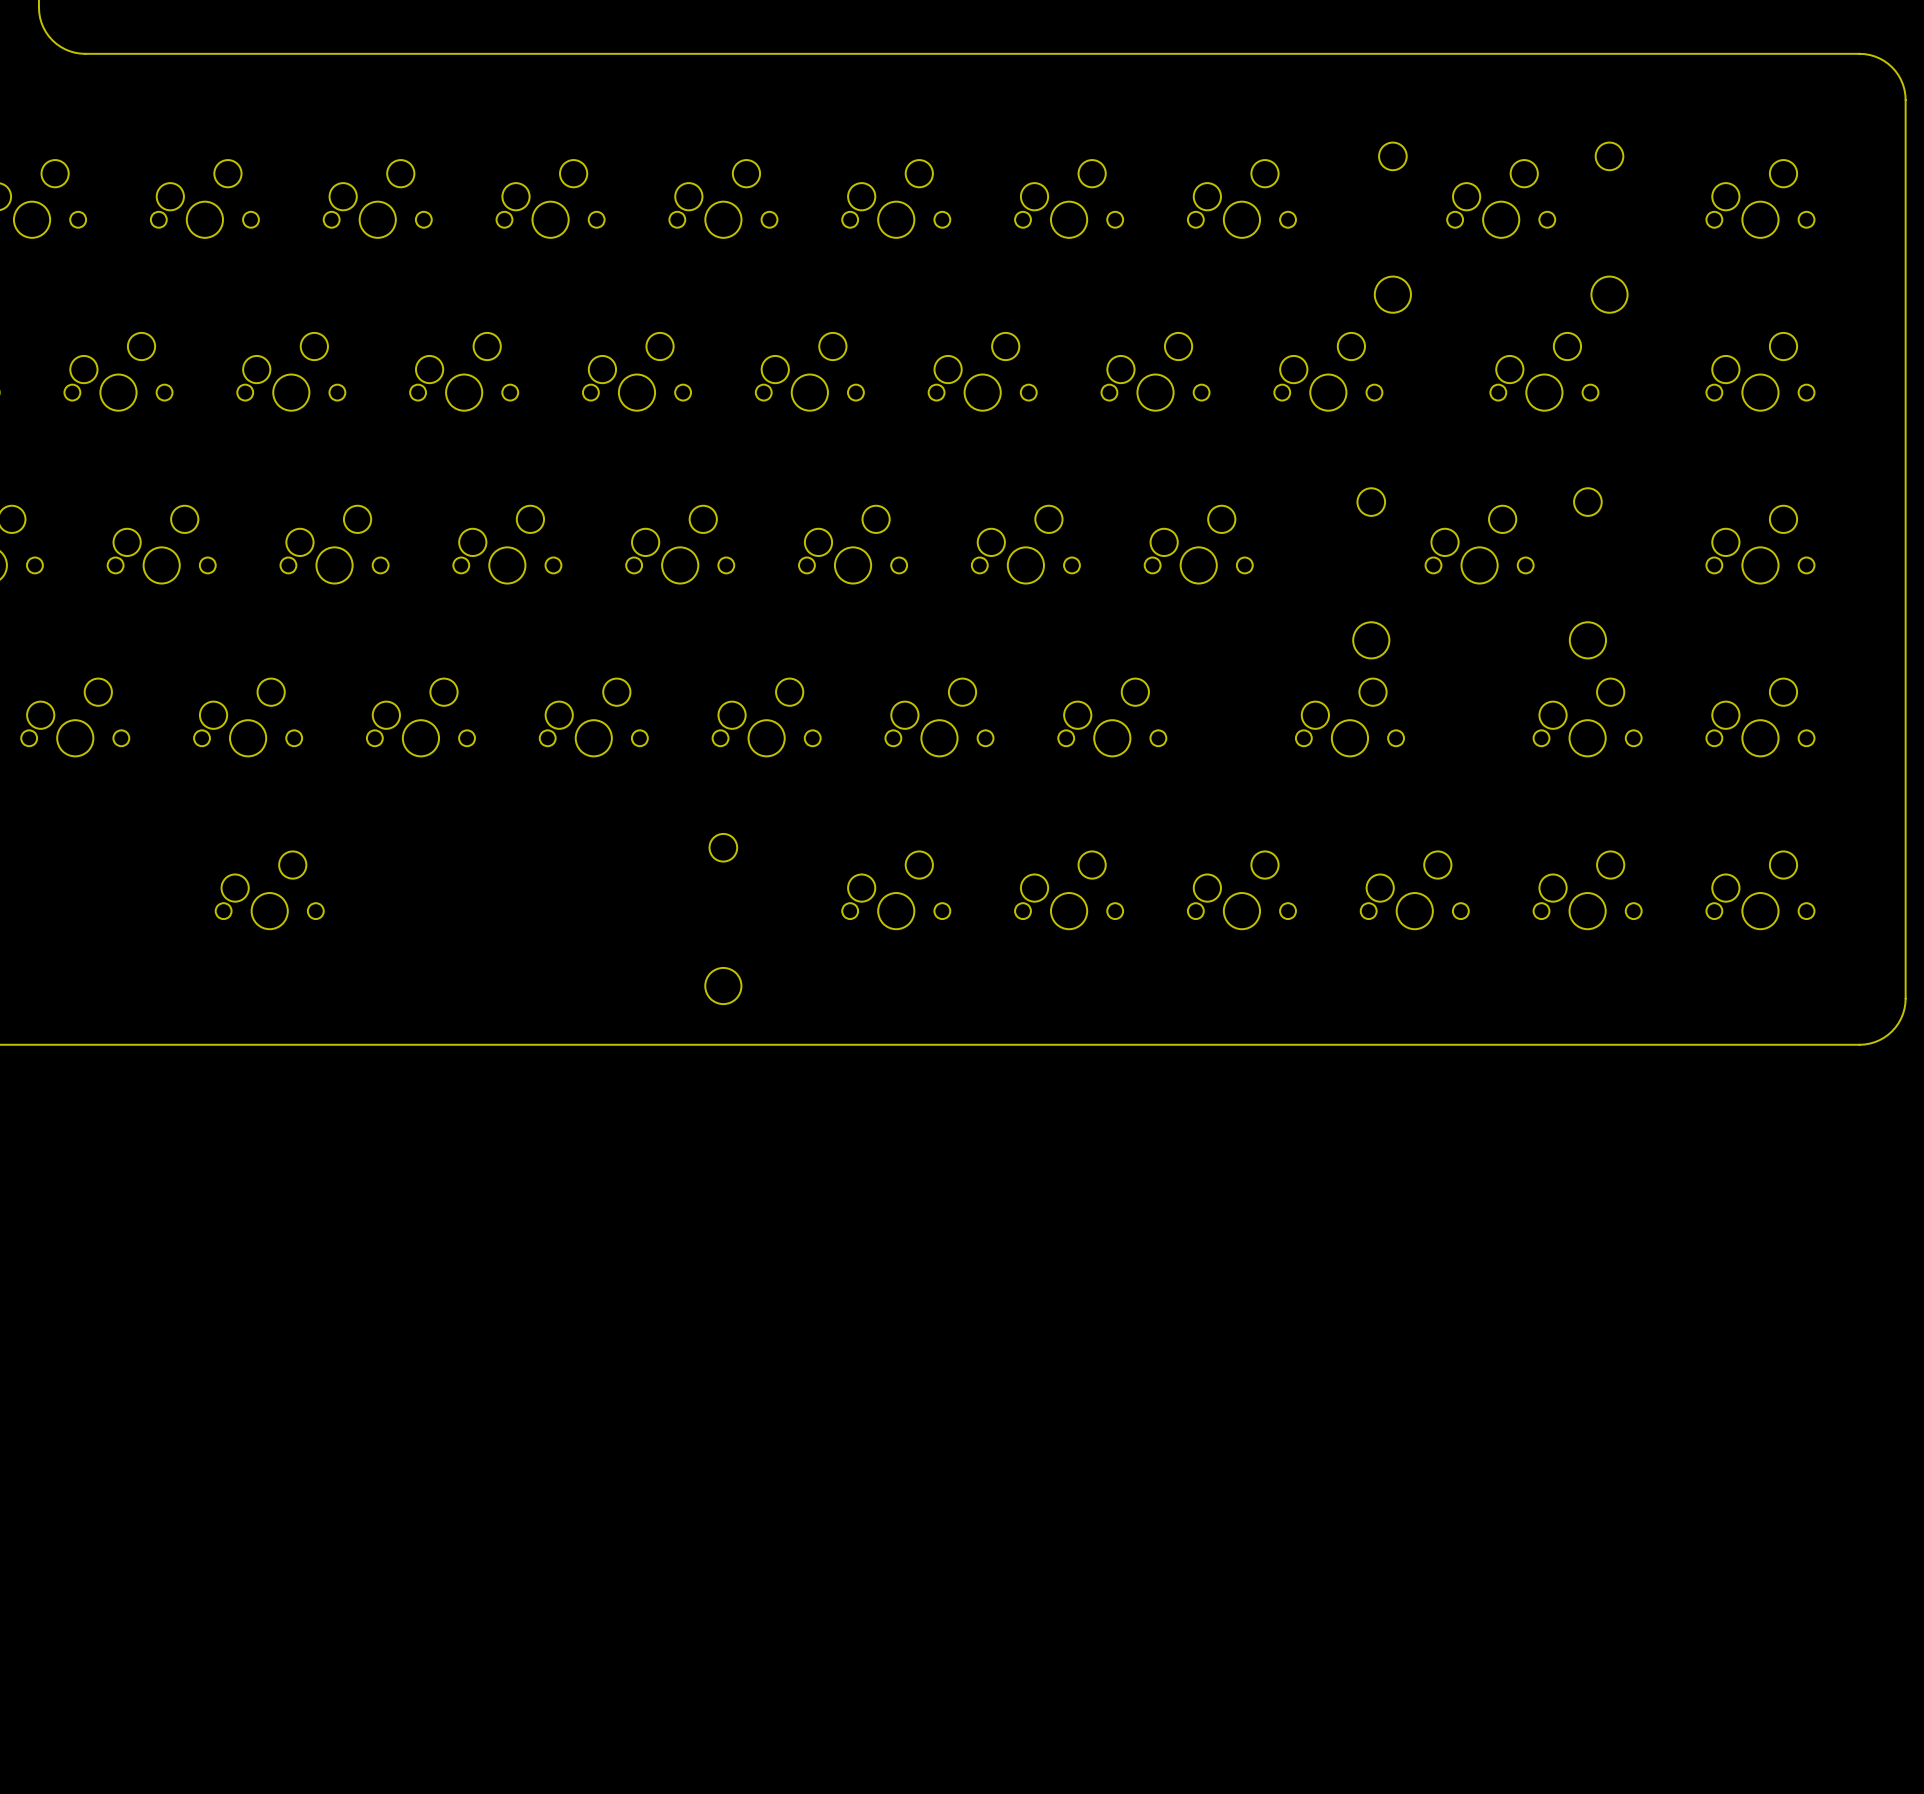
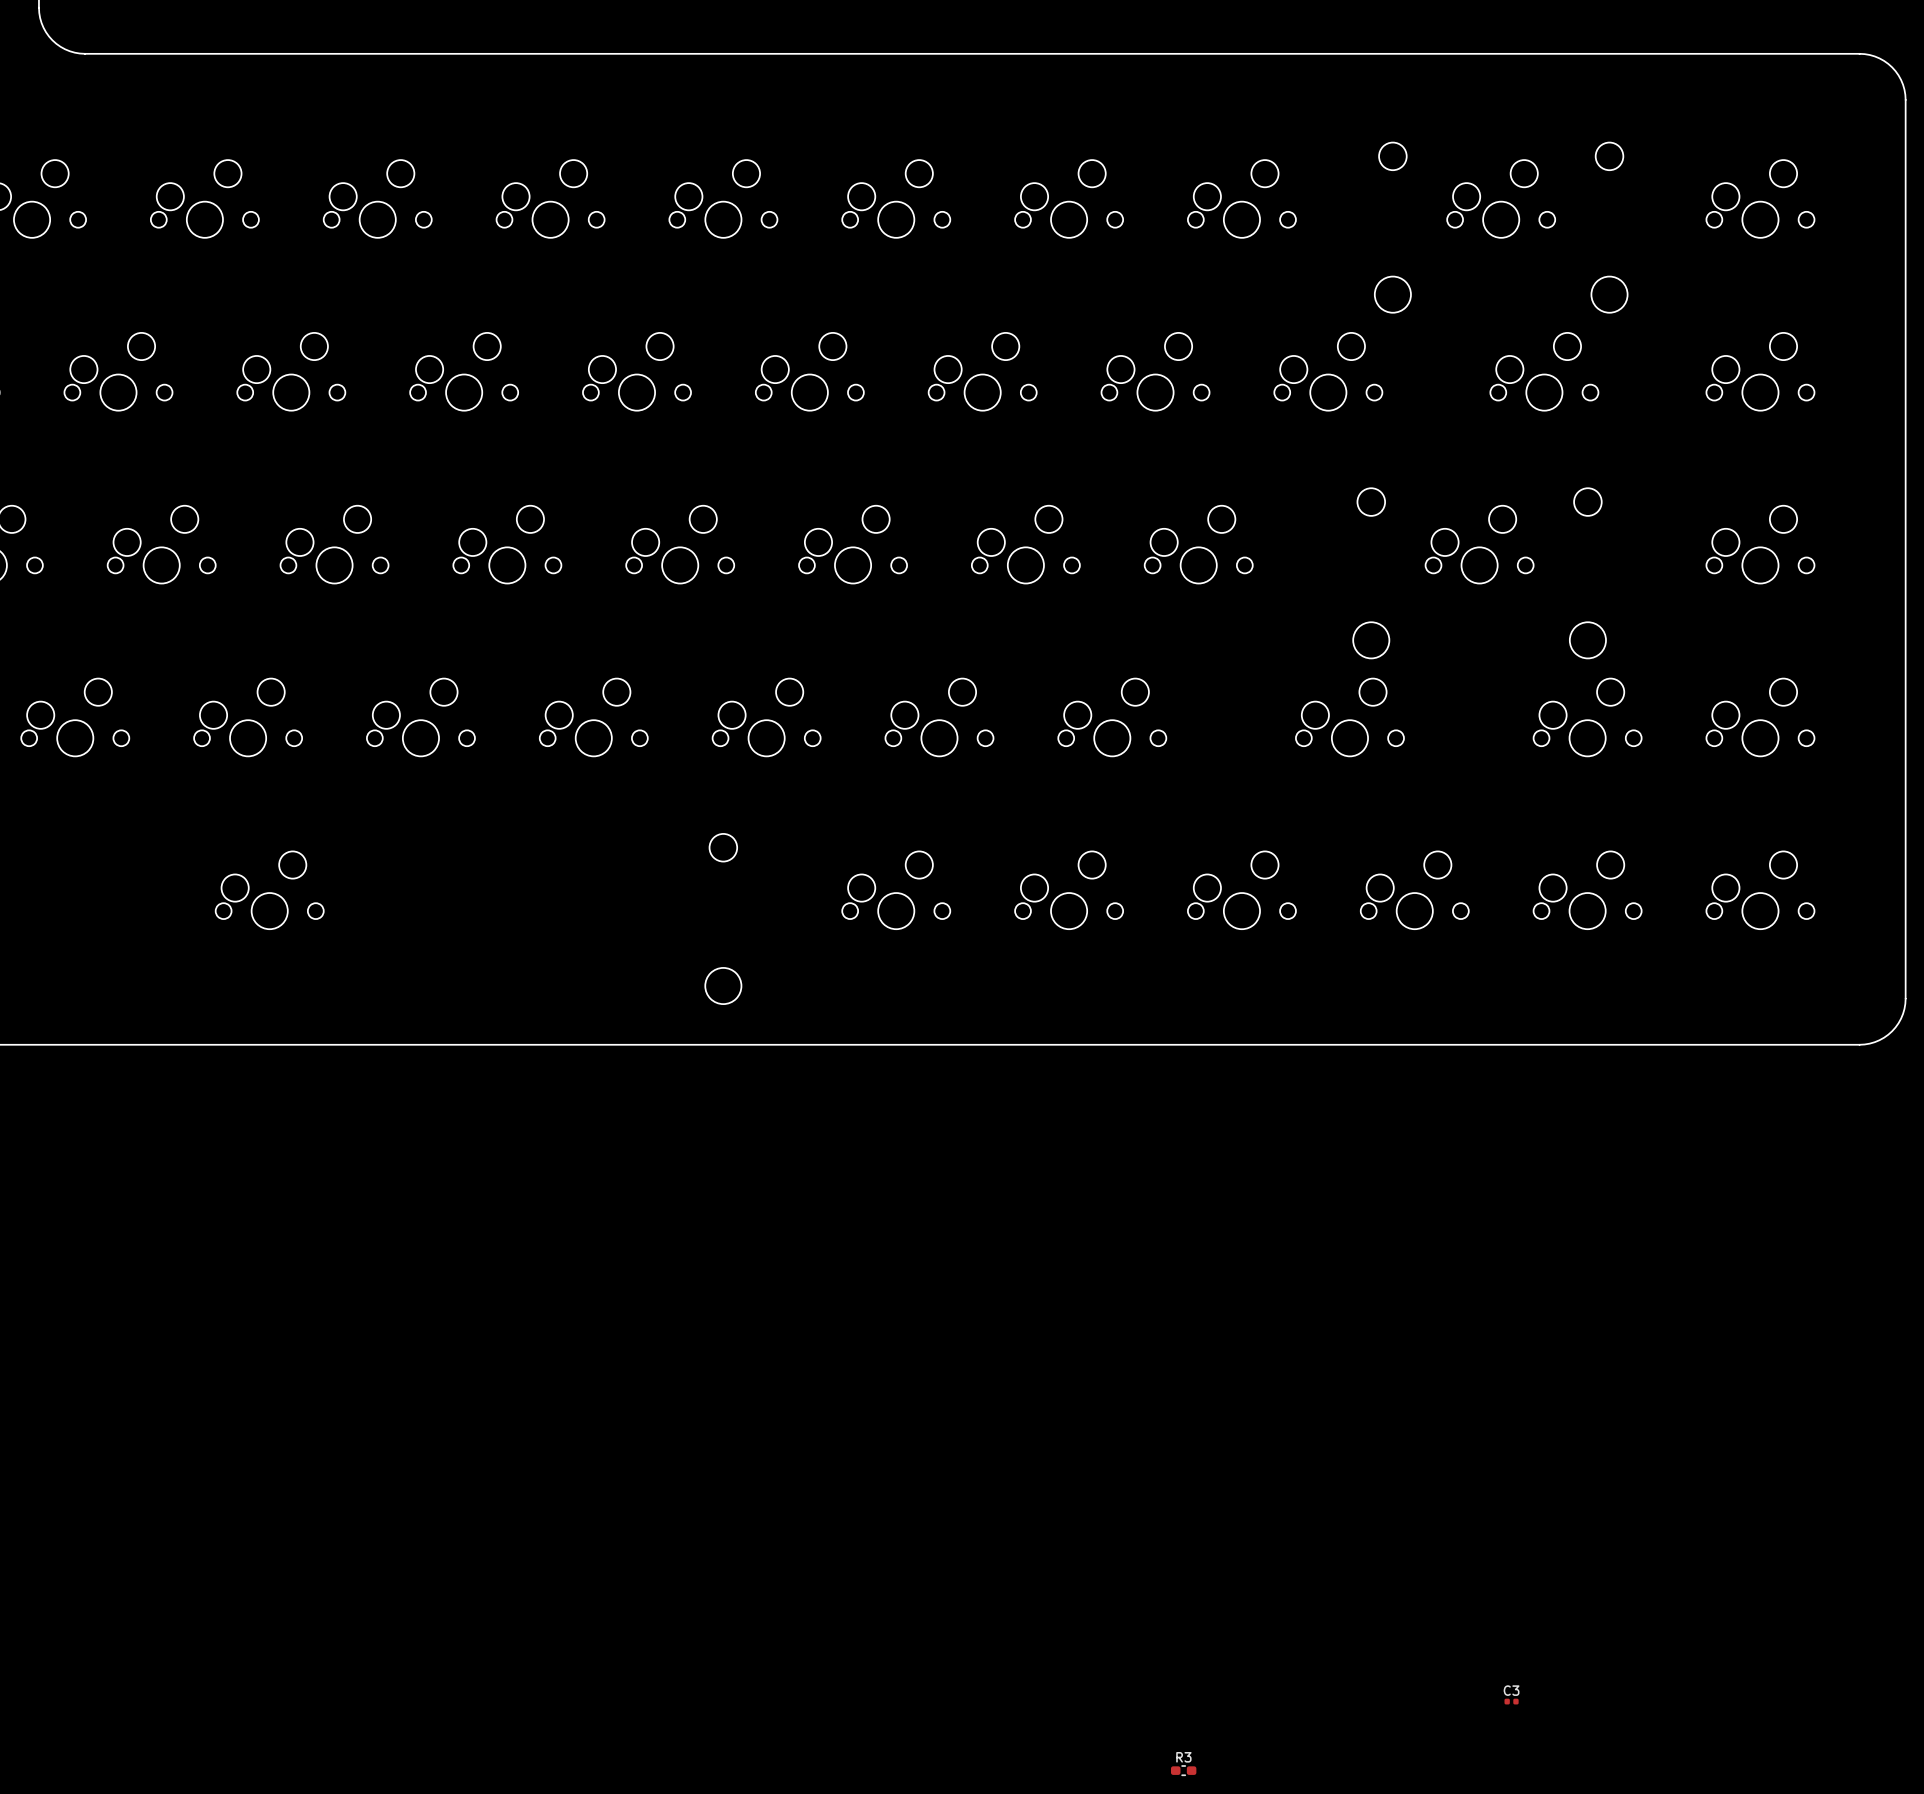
C3: none -> (1511, 1701)
R3: none -> (1183, 1770)

